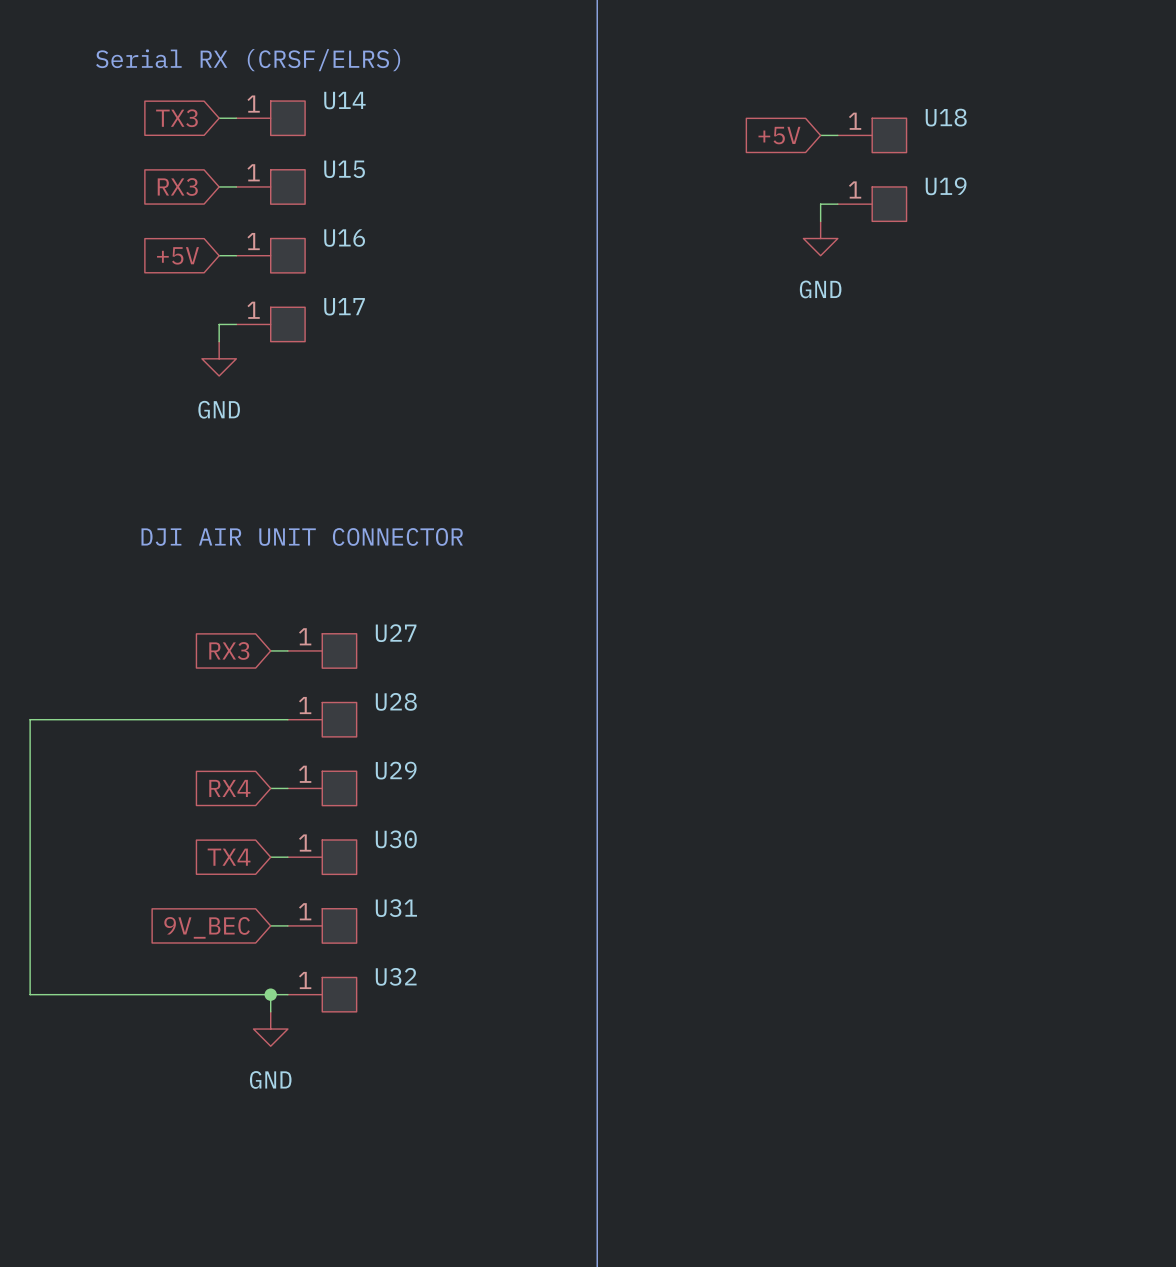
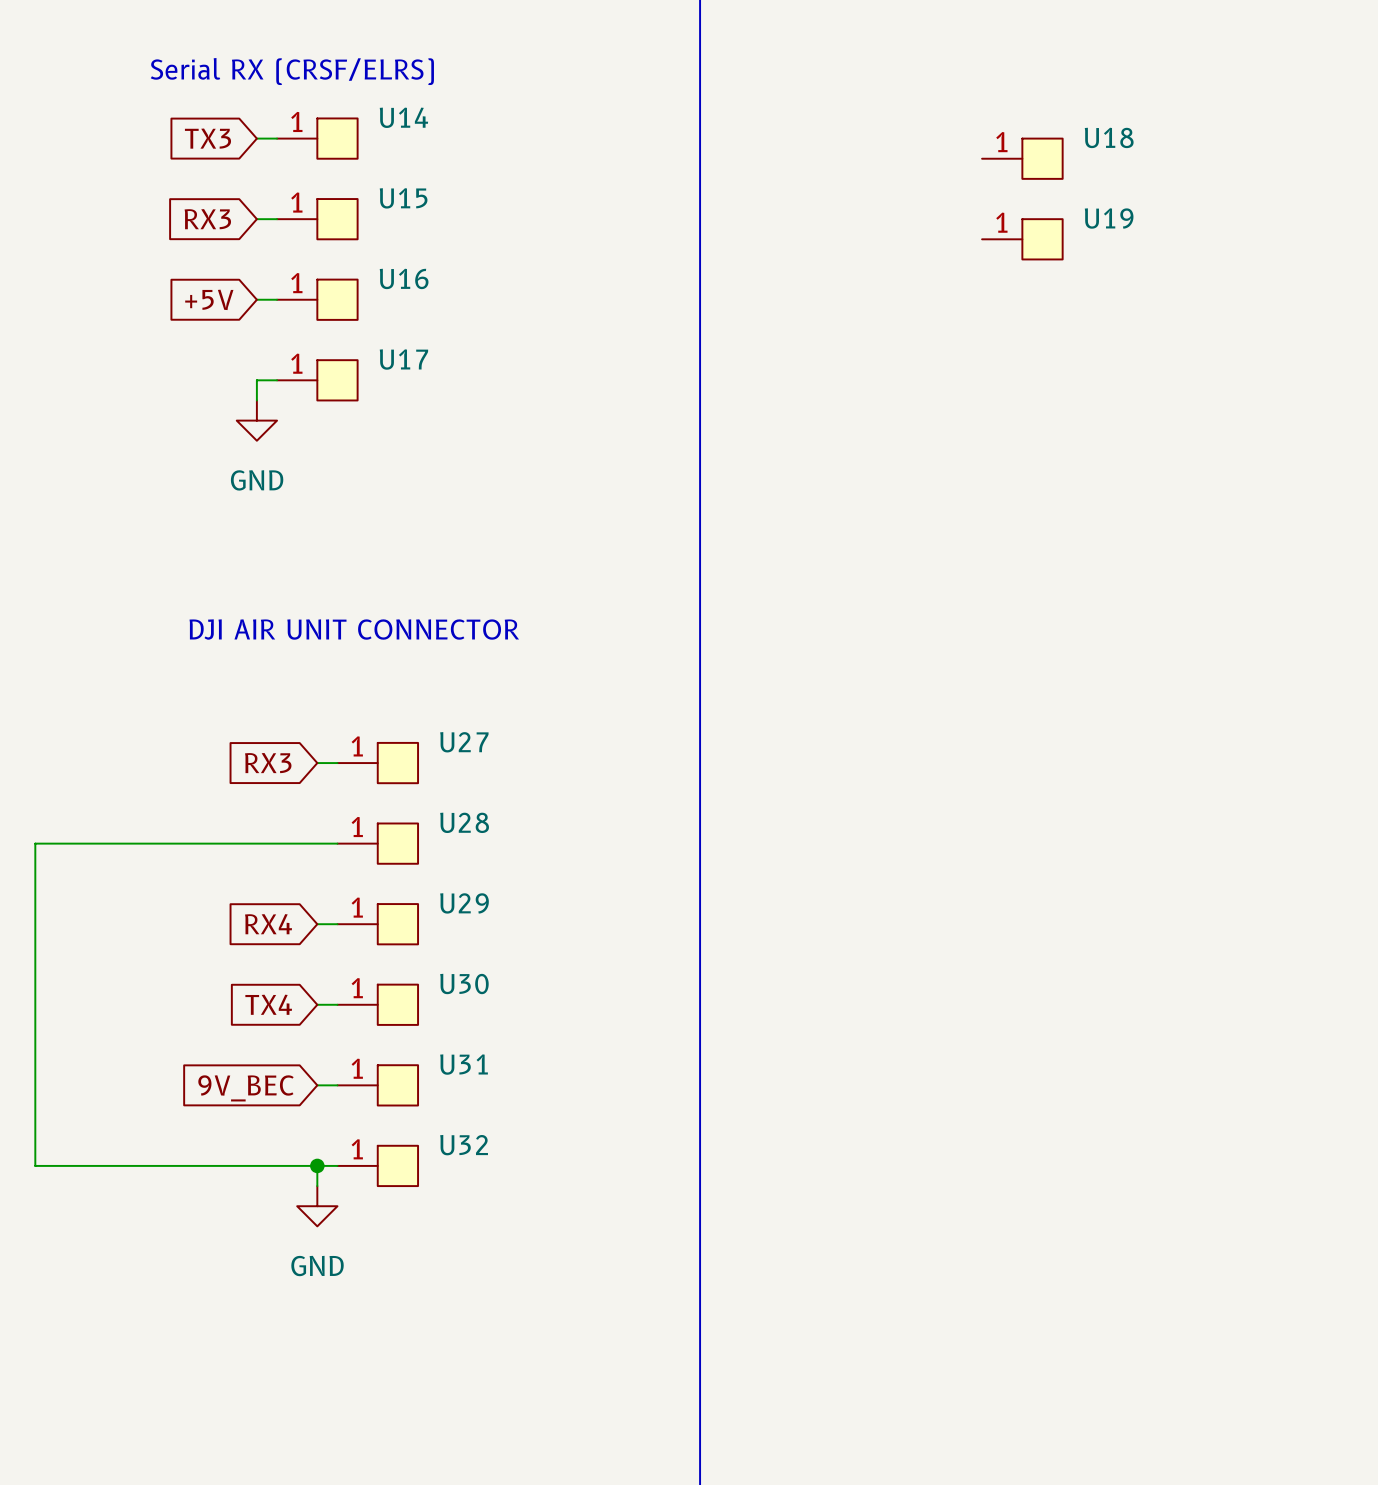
global label: +5V (779, 135) -> none
wire: (820, 135) (837, 135) -> none
wire: (837, 204) (820, 204) (820, 221) -> none
power symbol: GND (820, 238) -> none

